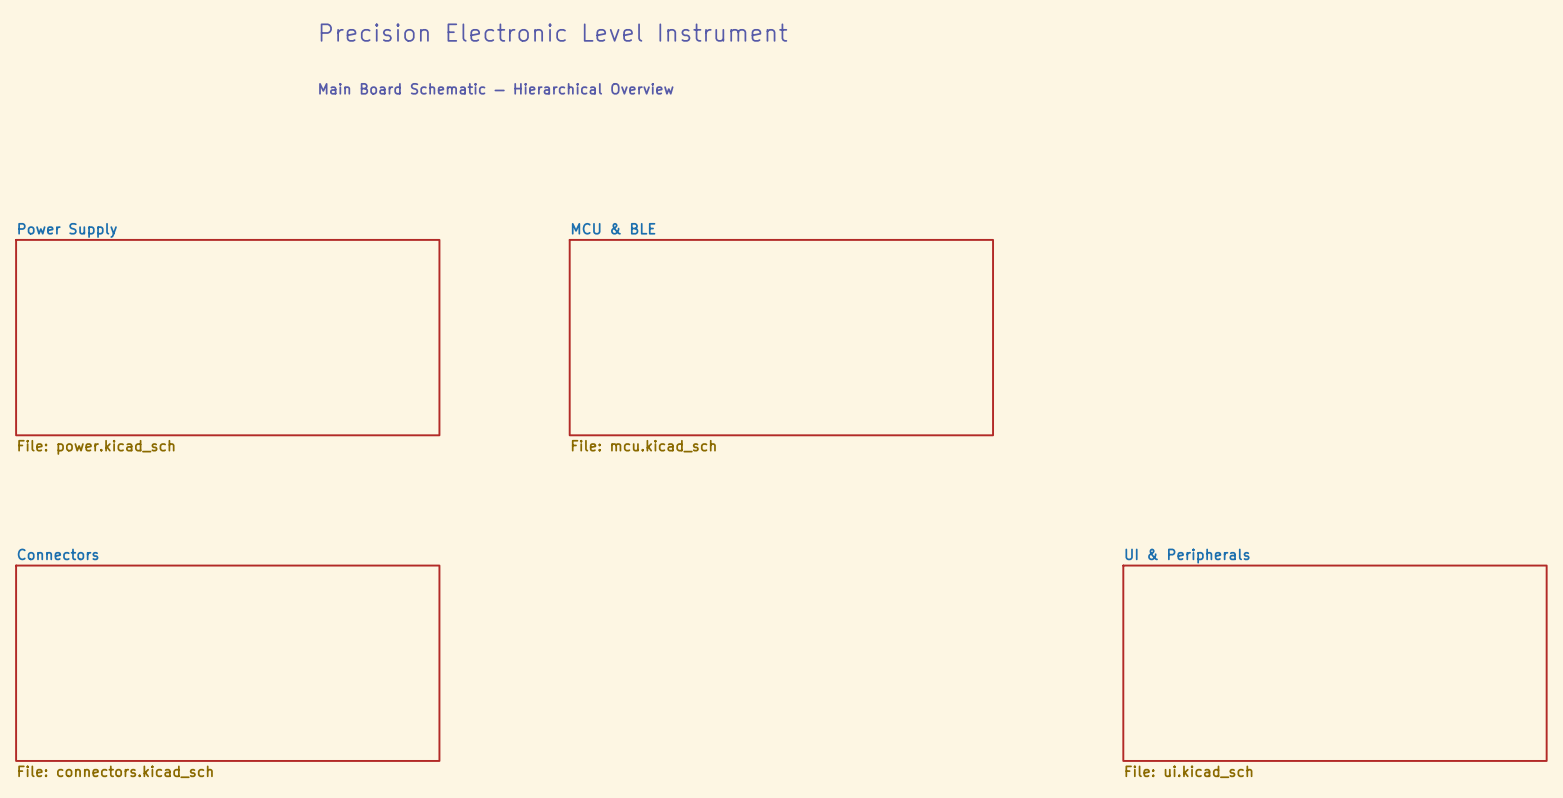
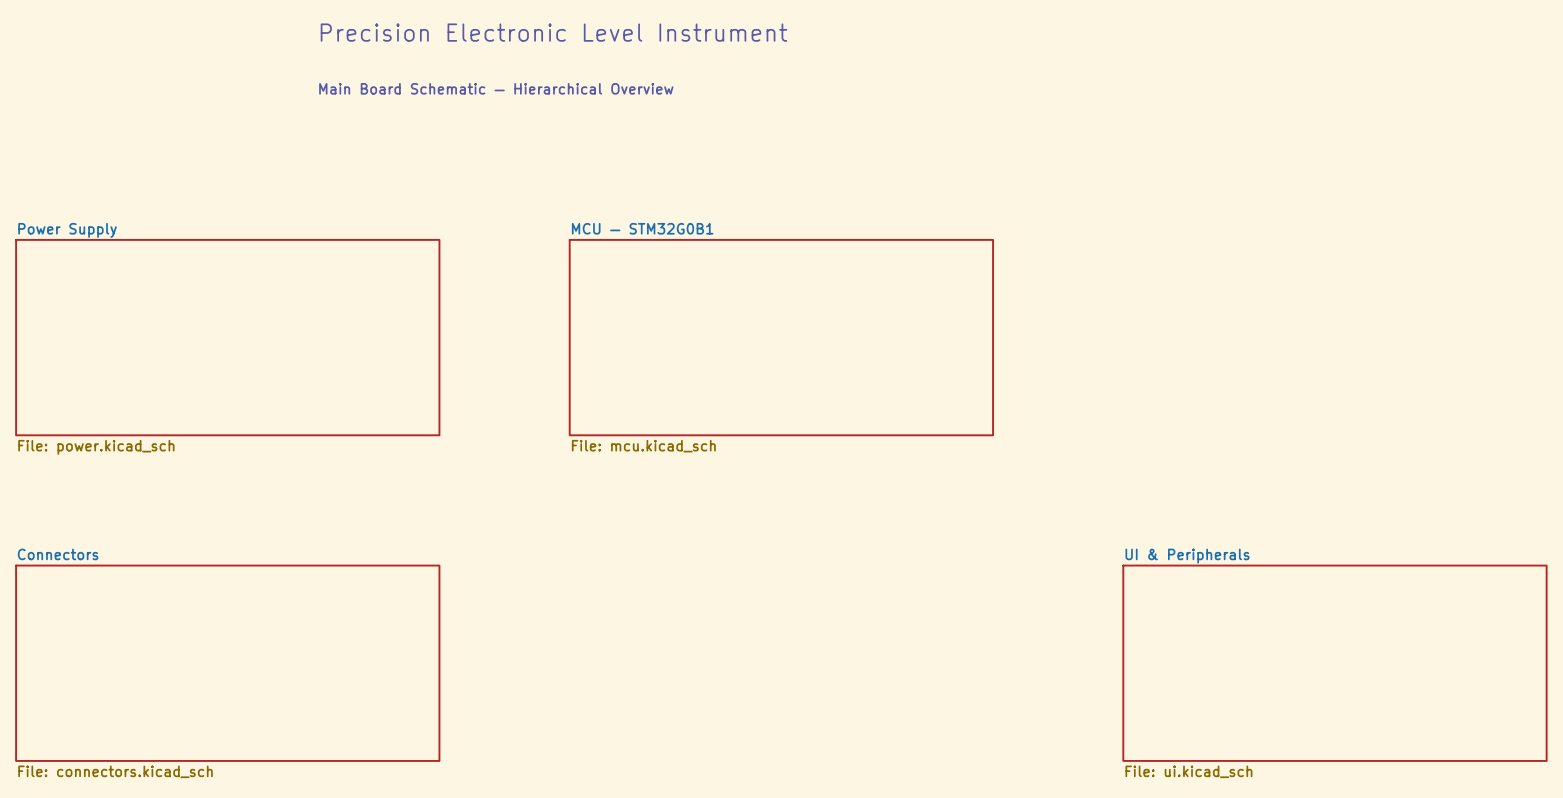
sheet MCU & BLE name: MCU & BLE (613, 228) -> MCU — STM32G0B1 (642, 228)

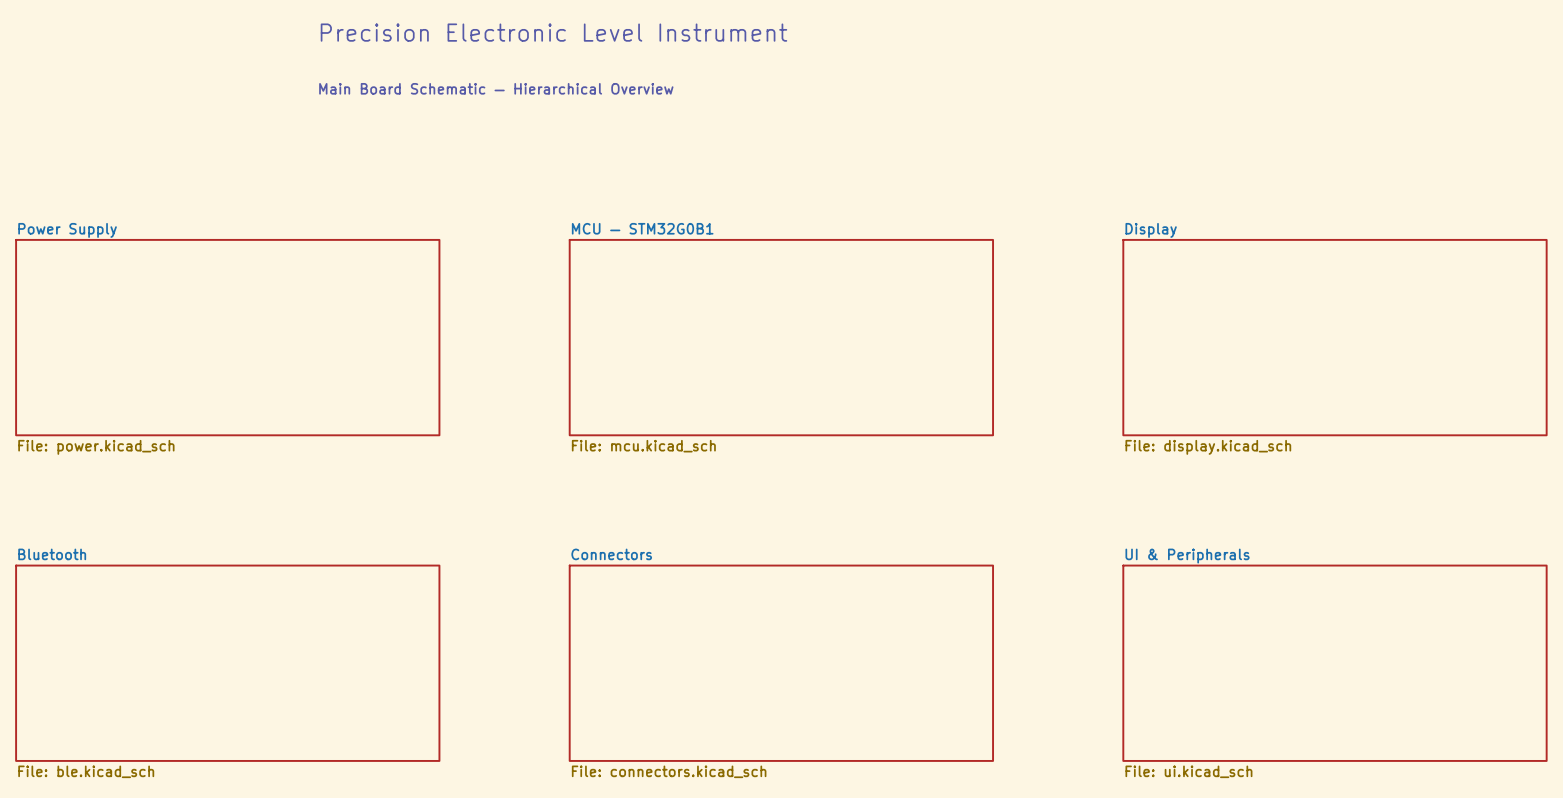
sheet Display: none -> File: display.kicad_sch (1334, 337)
sheet Connectors name: Connectors (58, 554) -> Bluetooth (52, 554)
sheet Connectors: none -> File: connectors.kicad_sch (781, 663)
sheet Connectors value: File: connectors.kicad_sch (115, 771) -> File: ble.kicad_sch (86, 771)

